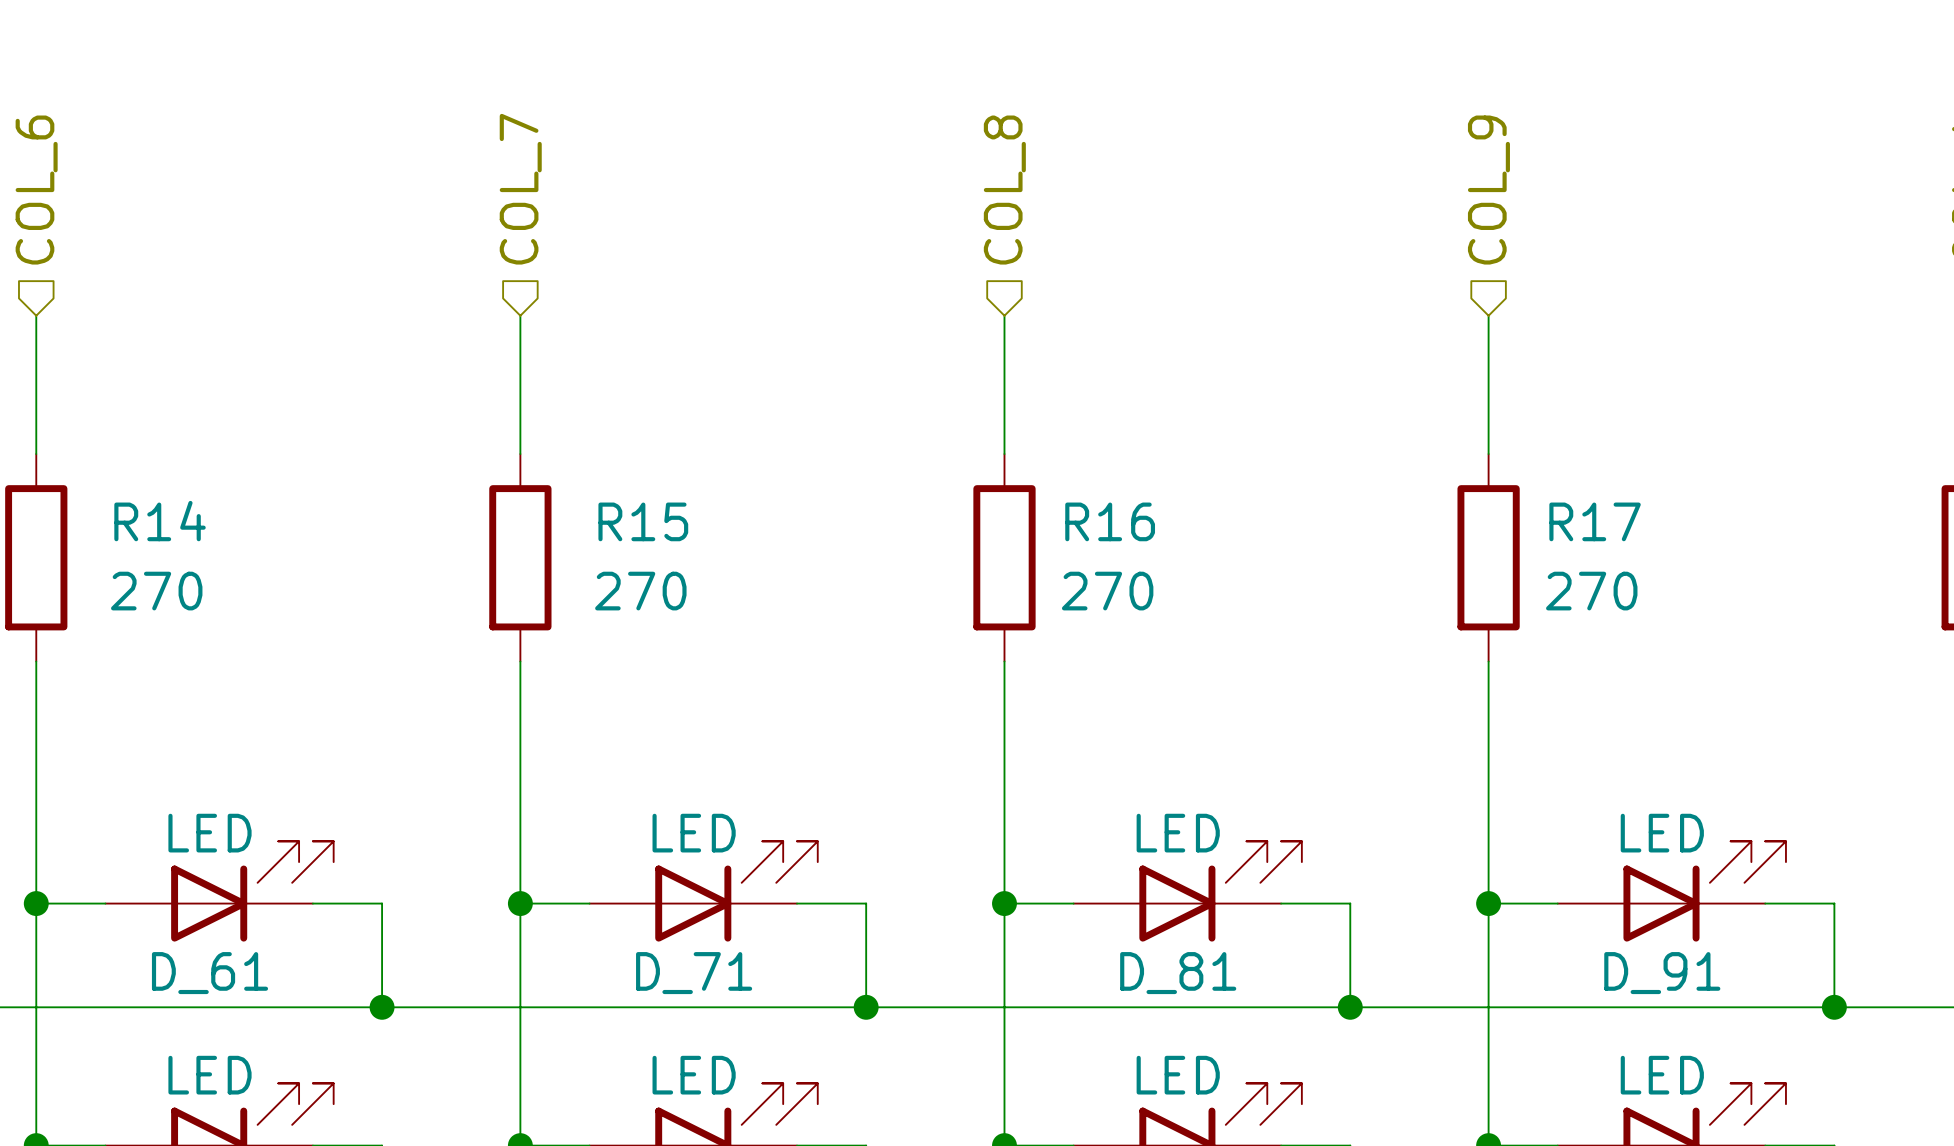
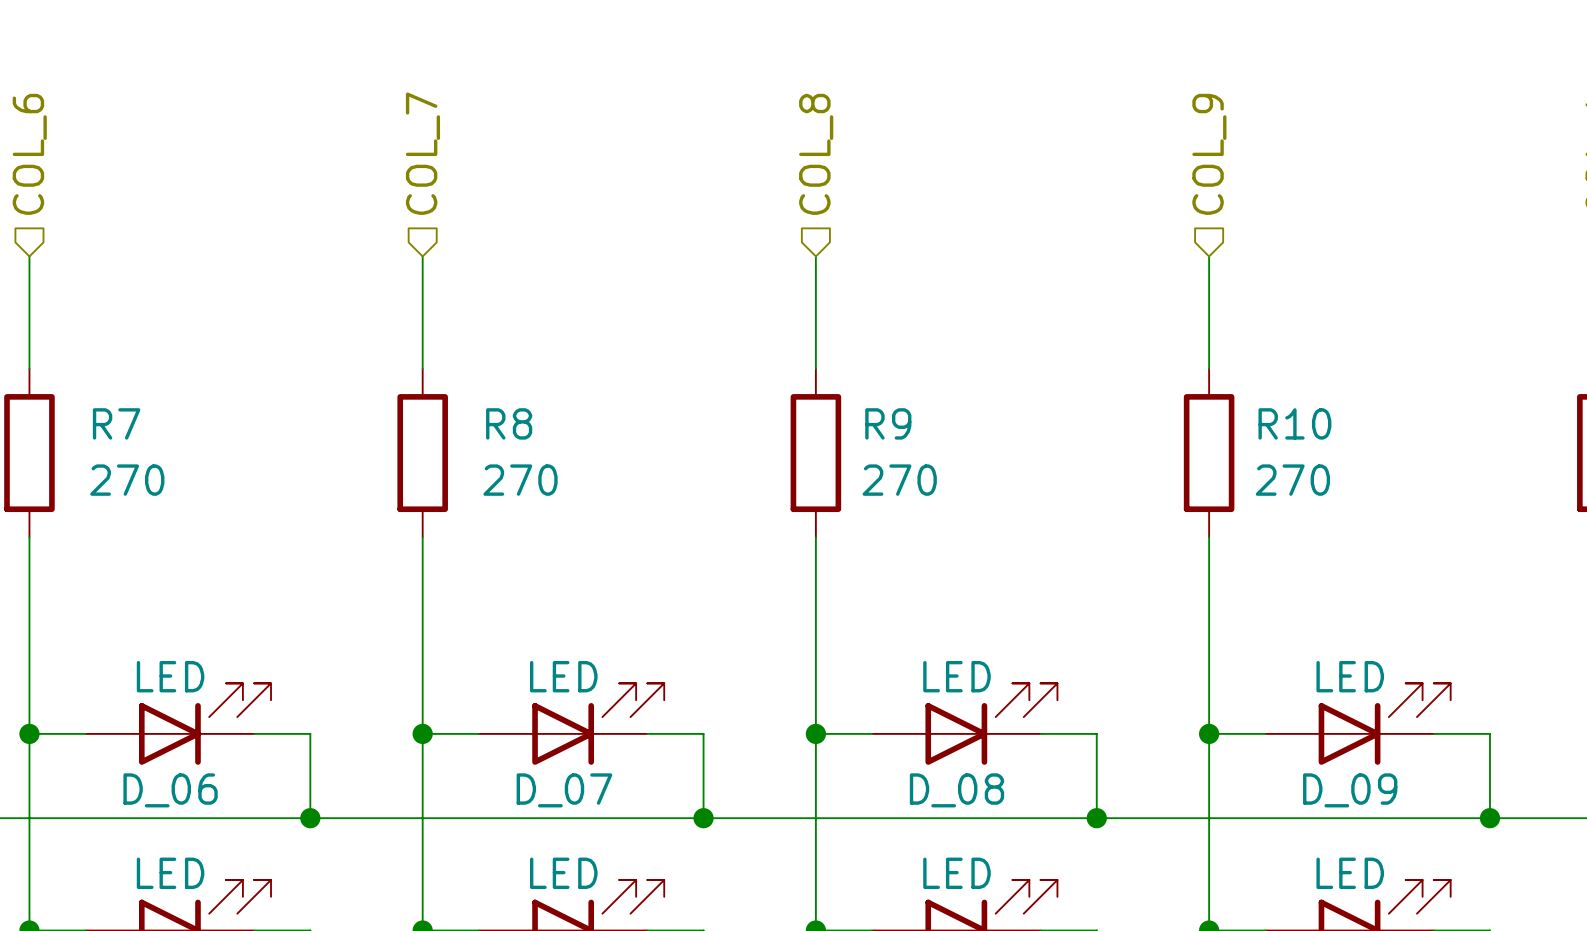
R14 name: R14 (160, 521) -> R7 (116, 423)
R15 name: R15 (643, 521) -> R8 (509, 423)
R16 name: R16 (1110, 521) -> R9 (888, 423)
R17 name: R17 (1595, 521) -> R10 (1294, 423)
D_61 name: D_61 (209, 973) -> D_06 (170, 790)
D_71 name: D_71 (694, 973) -> D_07 (564, 790)
D_81 name: D_81 (1178, 973) -> D_08 (957, 790)
D_91 name: D_91 (1662, 973) -> D_09 (1350, 790)

